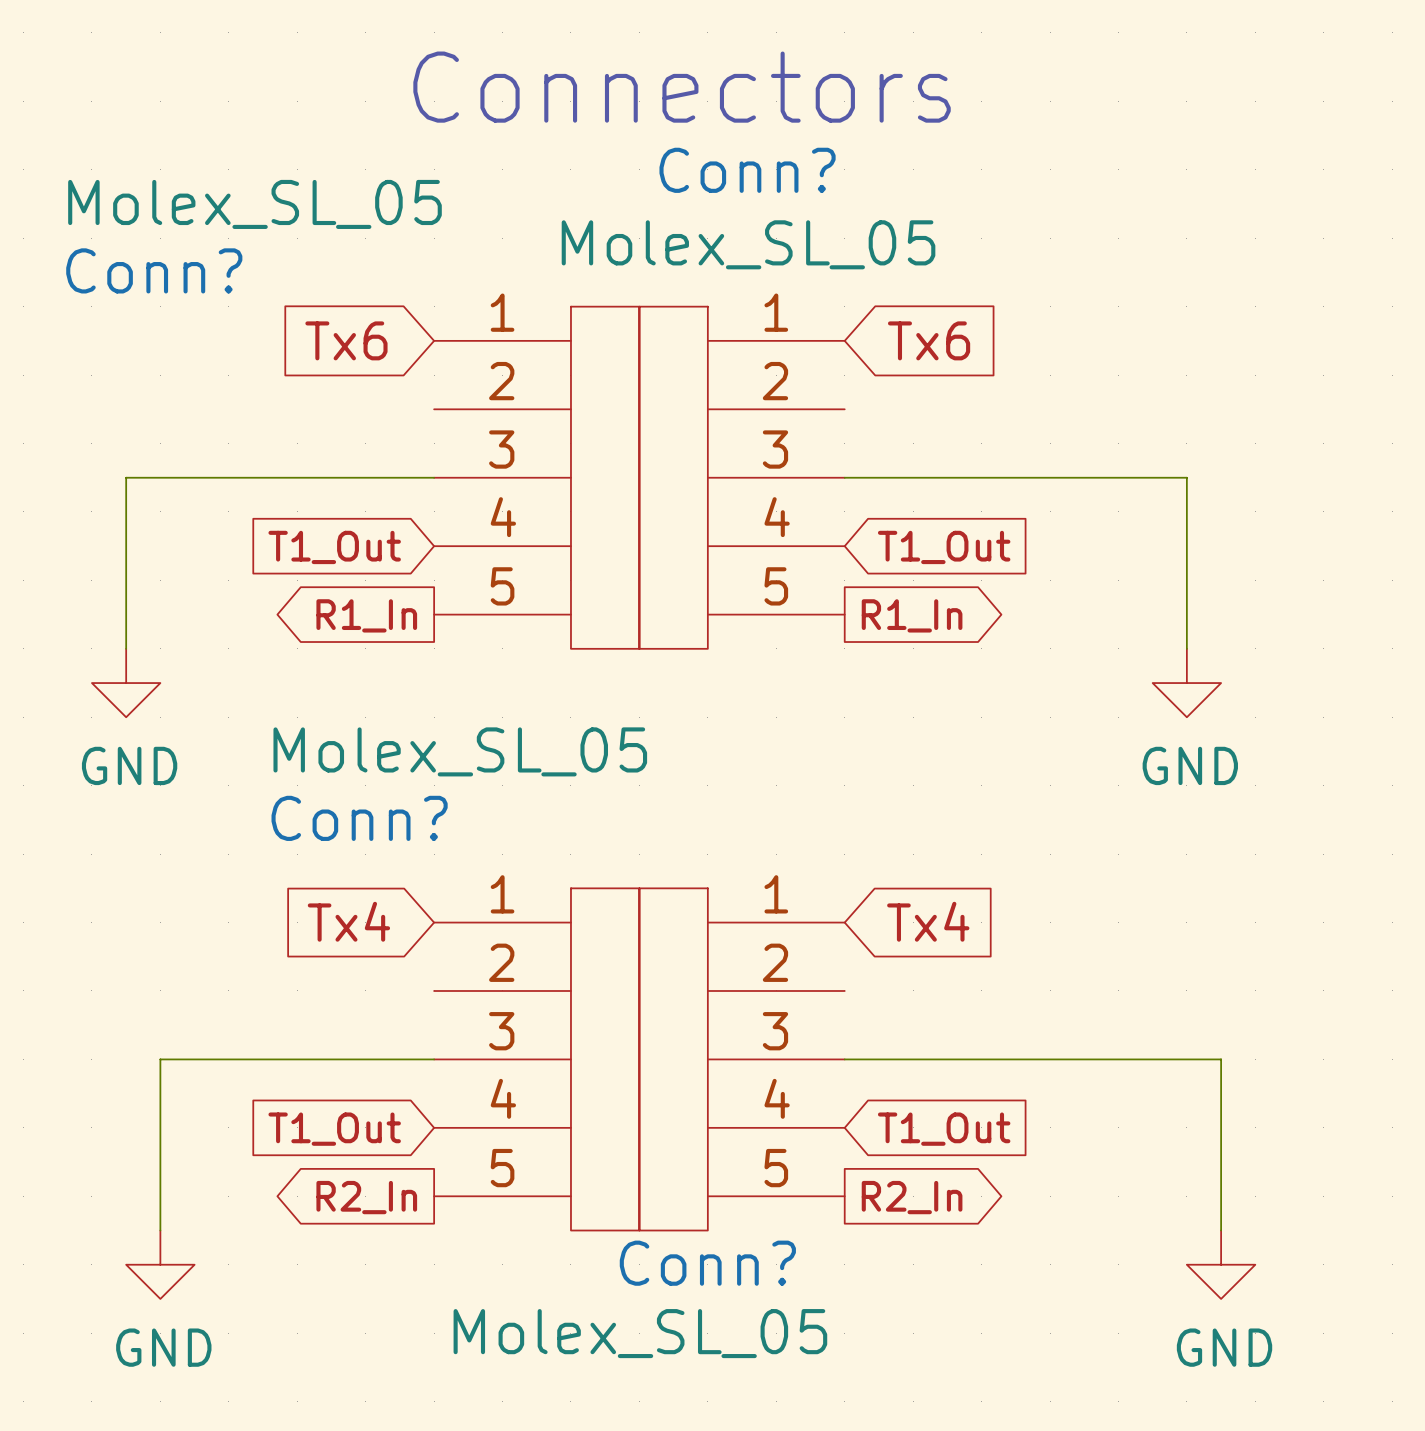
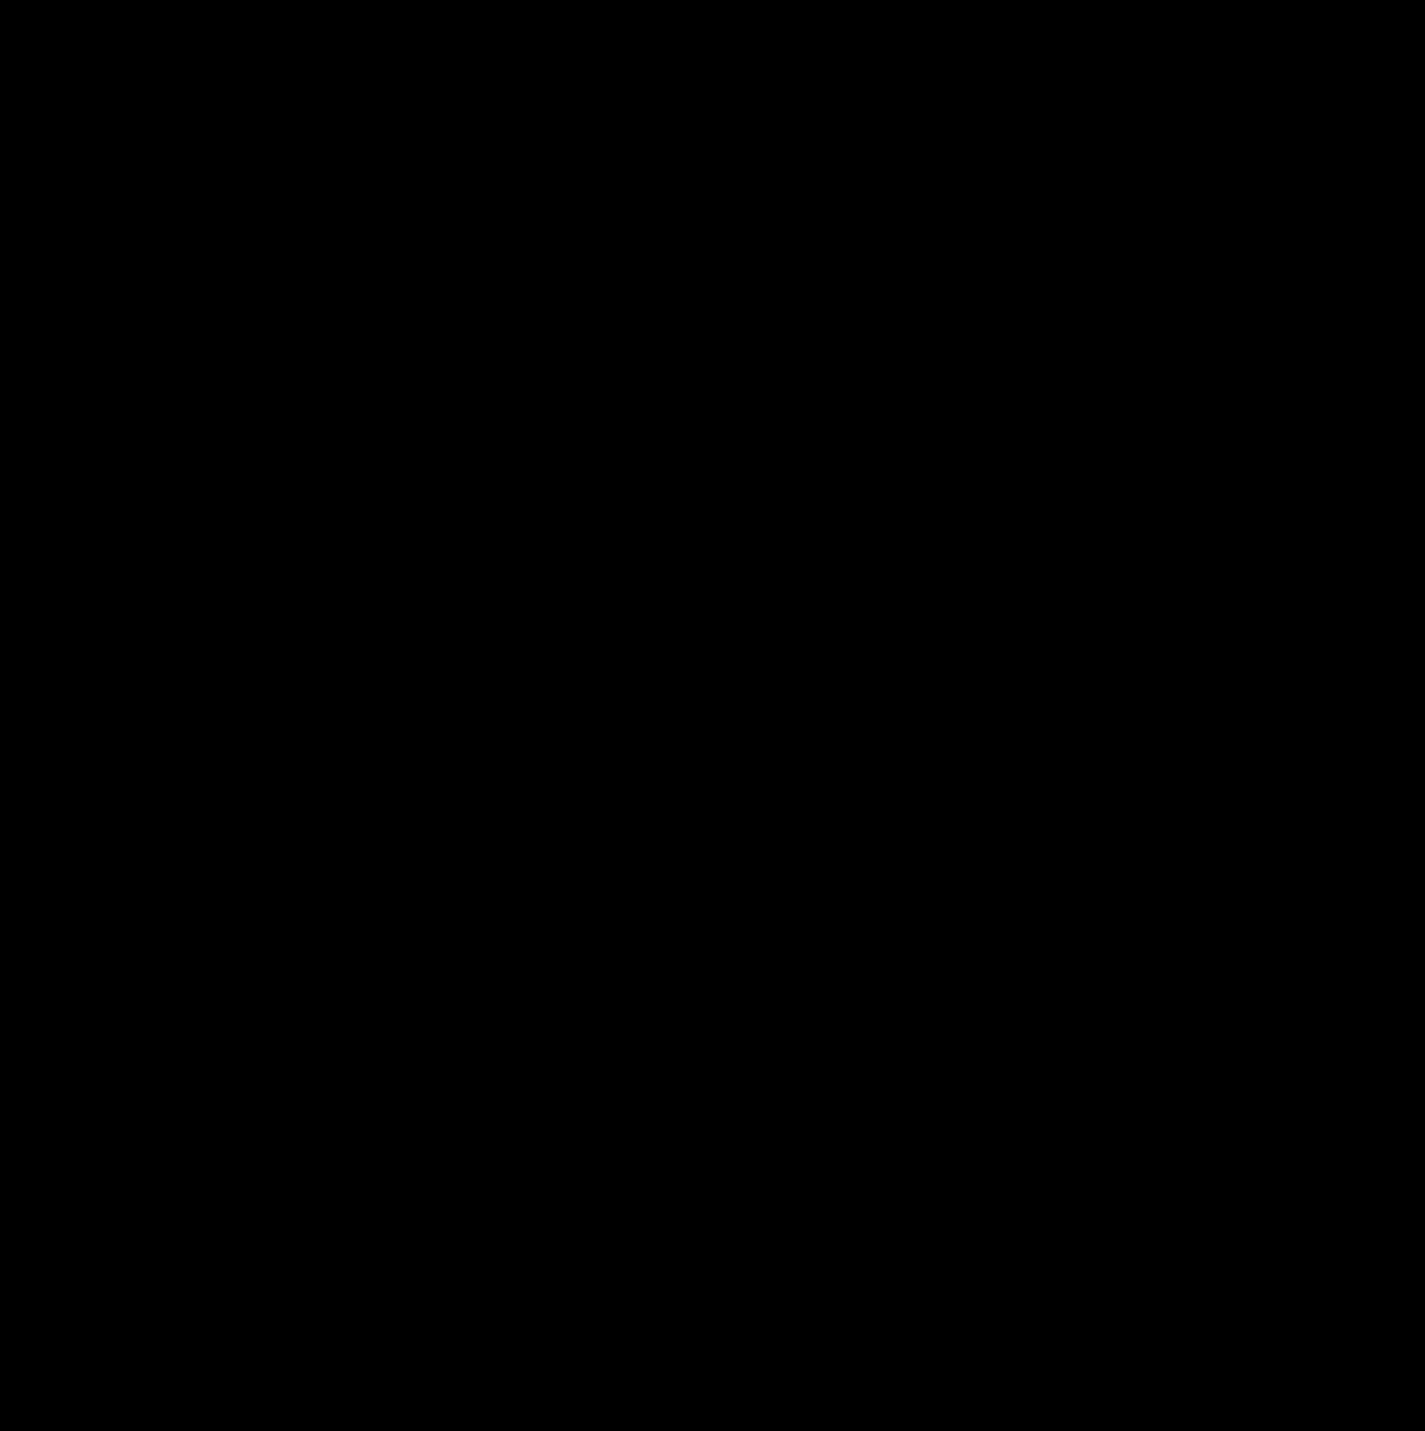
text: Connectors (682, 87) -> none
global label: Tx6 (346, 340) -> none
global label: Tx6 (929, 340) -> none
wire: (434, 477) (126, 477) (126, 648) -> none
Conn?: Molex_SL_05 (536, 477) -> none
Conn?: Molex_SL_05 (742, 477) -> none
wire: (844, 477) (1186, 477) (1186, 648) -> none
global label: T1_Out (334, 547) -> none
global label: T1_Out (944, 547) -> none
global label: R1_In (366, 615) -> none
global label: R1_In (912, 615) -> none
power symbol: GND (126, 683) -> none
power symbol: GND (1186, 683) -> none
global label: Tx4 (348, 921) -> none
global label: Tx4 (928, 921) -> none
wire: (434, 1059) (160, 1059) (160, 1230) -> none
Conn?: Molex_SL_05 (536, 1059) -> none
Conn?: Molex_SL_05 (742, 1059) -> none
wire: (844, 1059) (1221, 1059) (1221, 1230) -> none
global label: T1_Out (334, 1129) -> none
global label: T1_Out (944, 1129) -> none
global label: R2_In (366, 1197) -> none
global label: R2_In (912, 1197) -> none
power symbol: GND (160, 1264) -> none
power symbol: GND (1221, 1264) -> none

